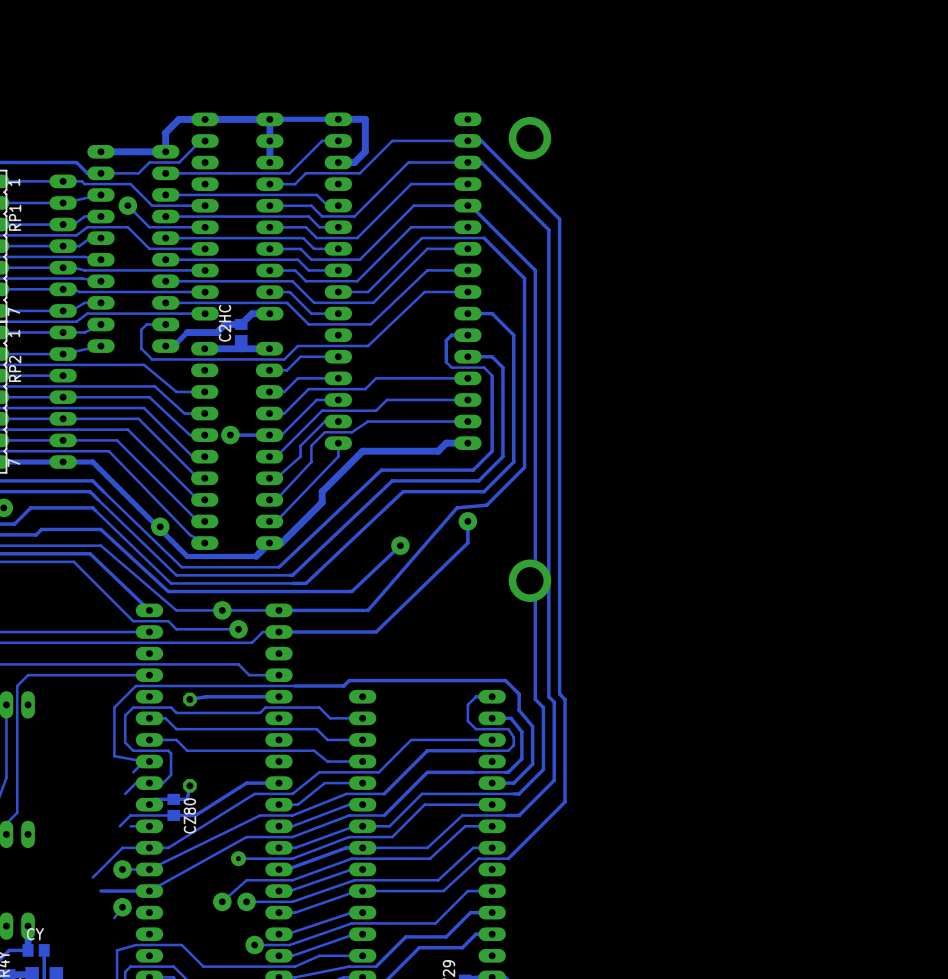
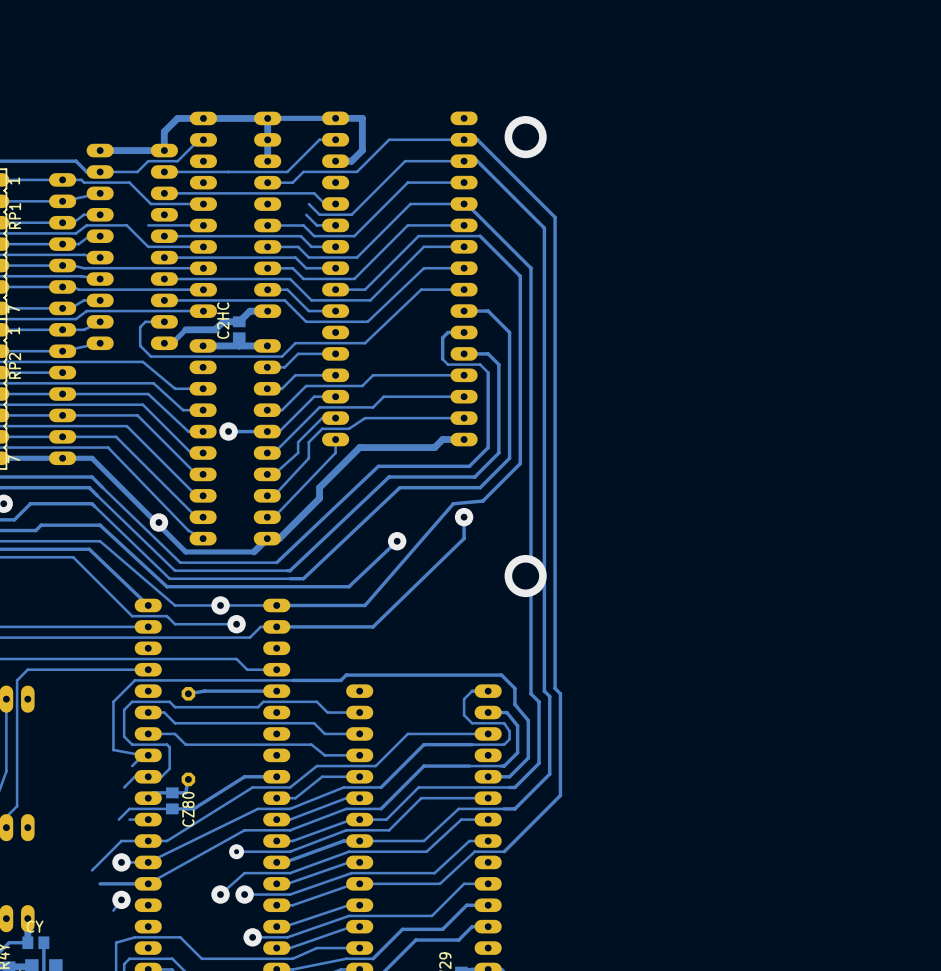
track: (127, 205) (149, 227) -> none
via: (127, 205) -> none
track: (311, 205) (269, 205) -> none
track: (308, 216) (165, 216) -> none

